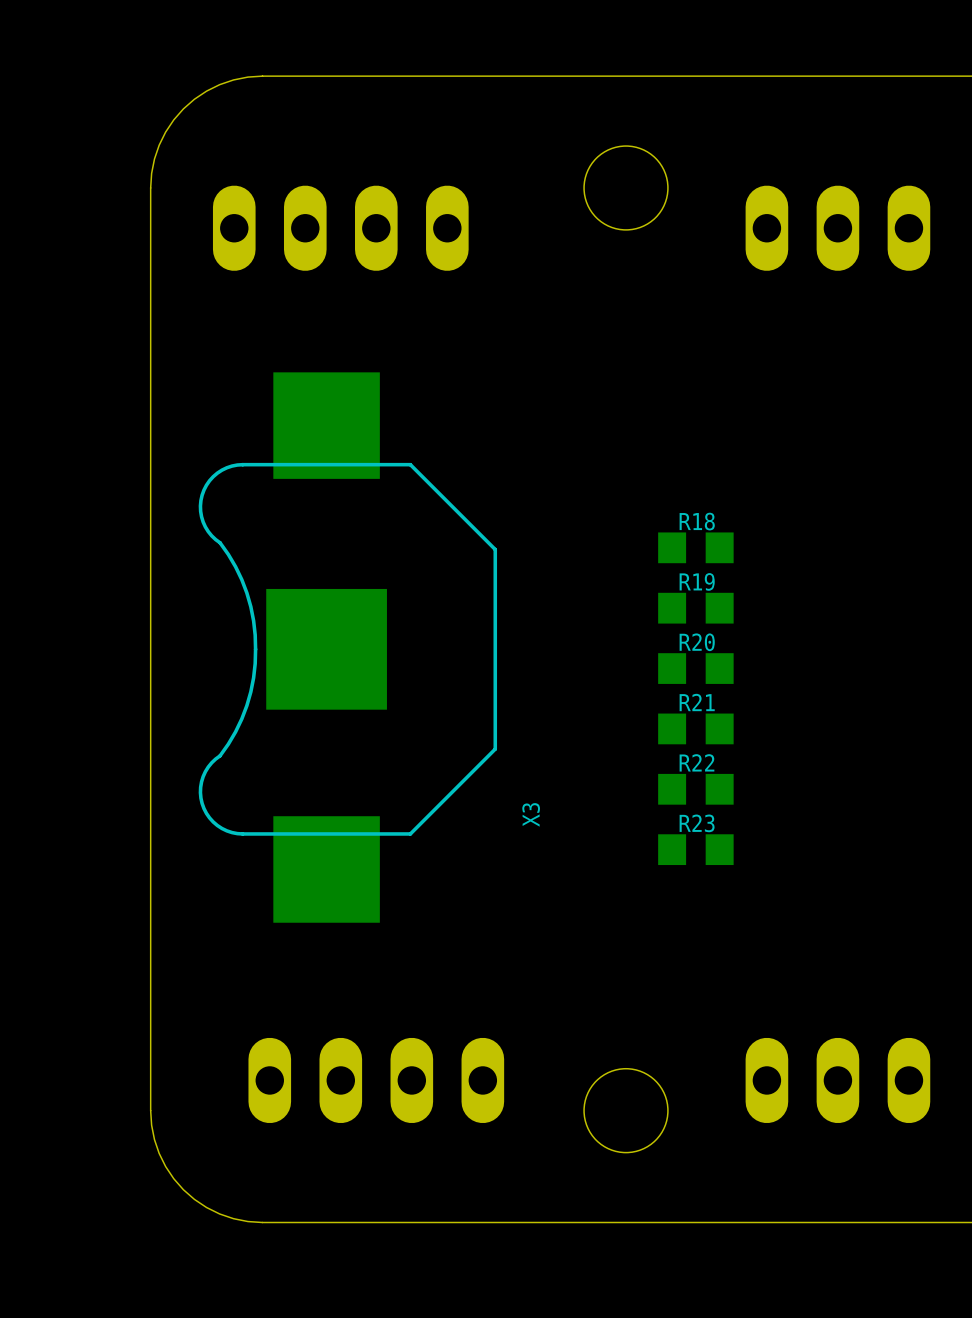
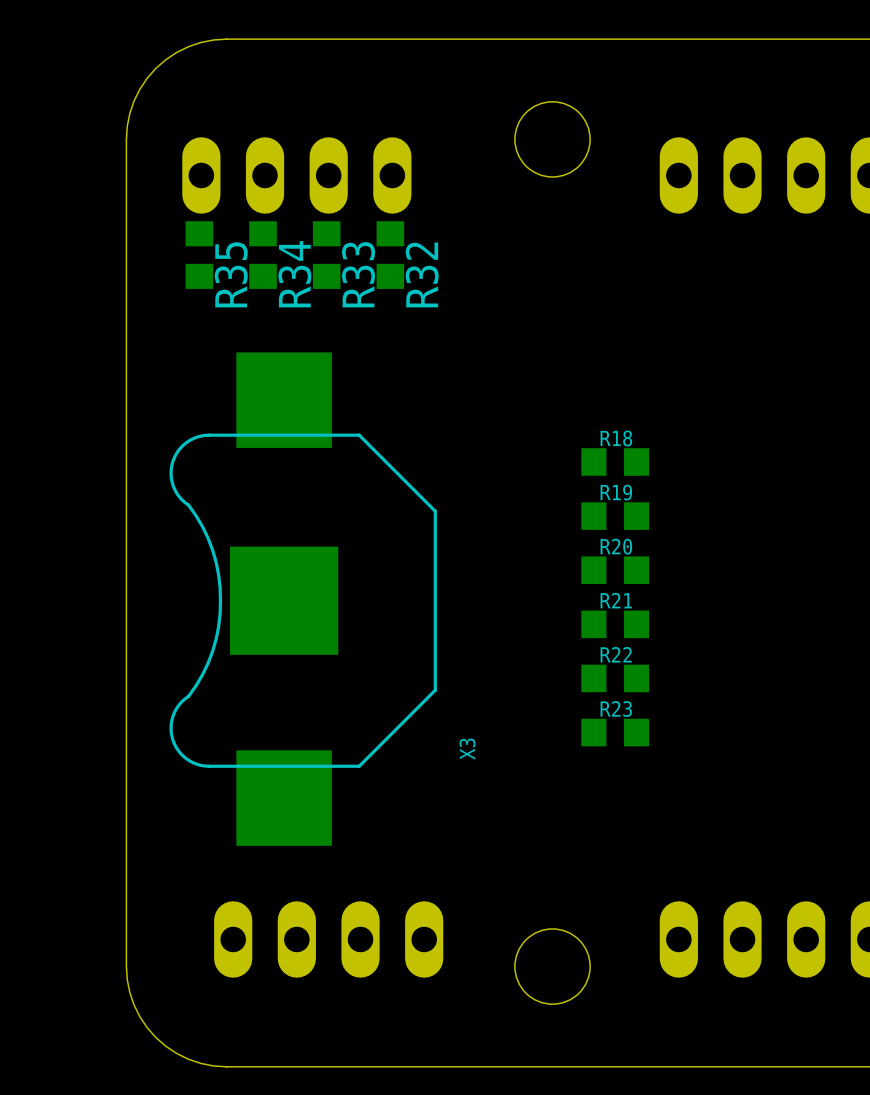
R35: none -> (199, 255)
R34: none -> (263, 255)
R33: none -> (326, 255)
R32: none -> (390, 255)
X3 position: (347, 647) -> (303, 599)

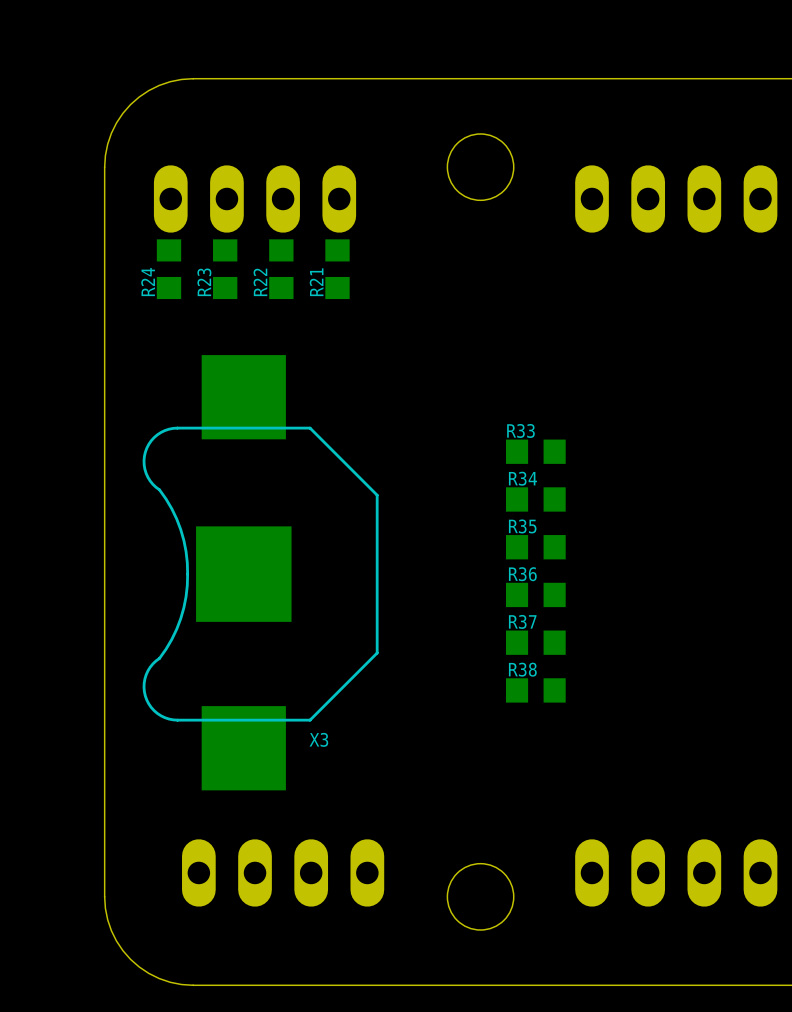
R35 name: R35 (231, 274) -> R24 (148, 282)
R34 name: R34 (294, 274) -> R23 (204, 282)
R33 name: R33 (358, 274) -> R22 (260, 282)
R32 name: R32 (422, 274) -> R21 (316, 282)
R18 name: R18 (616, 438) -> R33 (520, 430)
R19 name: R19 (616, 492) -> R34 (522, 478)
R20 name: R20 (616, 546) -> R35 (522, 526)
R21 name: R21 (616, 600) -> R36 (522, 574)
R22 name: R22 (616, 654) -> R37 (522, 621)
R23 name: R23 (616, 709) -> R38 (522, 669)
X3 name rotation: 0° (467, 749) -> 90° clockwise (318, 739)
X3 name position: X3 (467, 749) -> X3 (318, 739)

